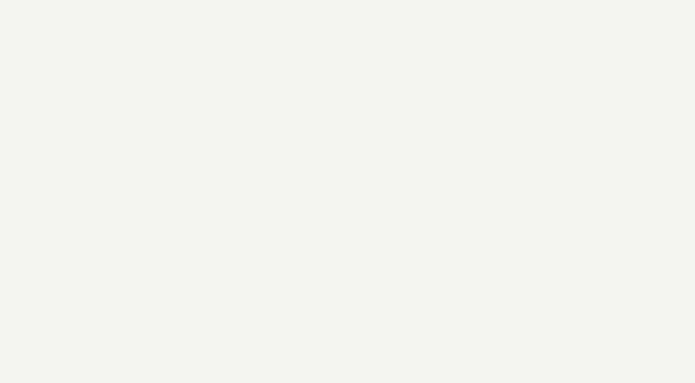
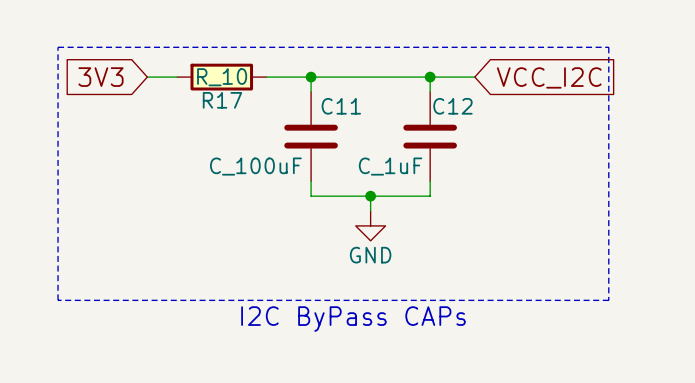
line: none -> (58, 47) (608, 47) (608, 300) (58, 300) (58, 47)
global label: none -> 3V3 (100, 77)
wire: none -> (147, 77) (177, 77)
R17: none -> R_10 (221, 77)
wire: none -> (266, 77) (474, 77)
wire: none -> (311, 77) (311, 91)
junction: none -> (311, 77)
wire: none -> (430, 77) (430, 91)
junction: none -> (430, 77)
global label: none -> VCC_I2C (549, 77)
C11: none -> C_100uF (311, 136)
C12: none -> C_1uF (430, 136)
wire: none -> (311, 181) (311, 196) (430, 196) (430, 181)
wire: none -> (370, 196) (370, 211)
junction: none -> (370, 196)
power symbol: none -> GND (370, 225)
text: none -> I2C ByPass CAPs (353, 319)

